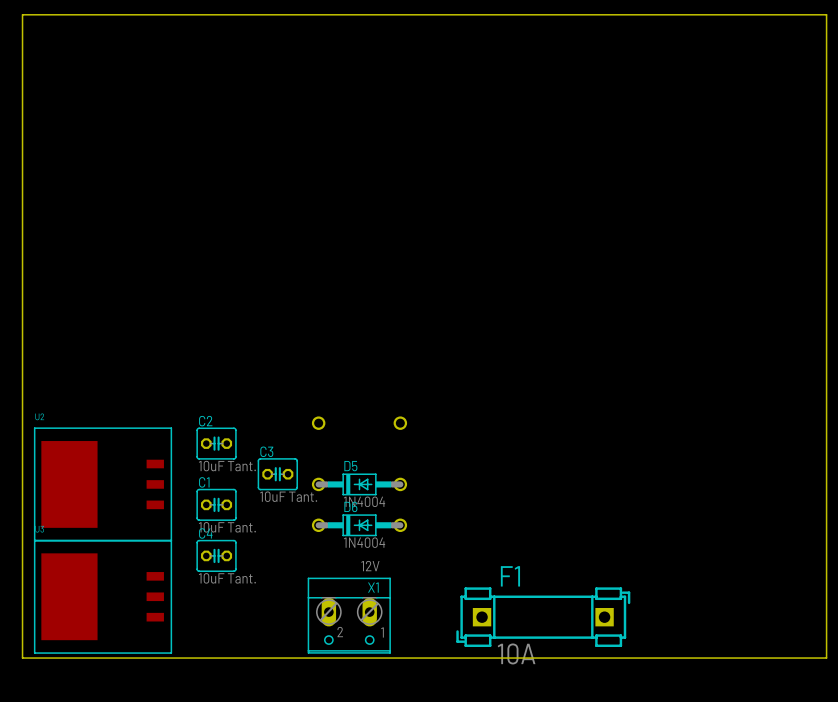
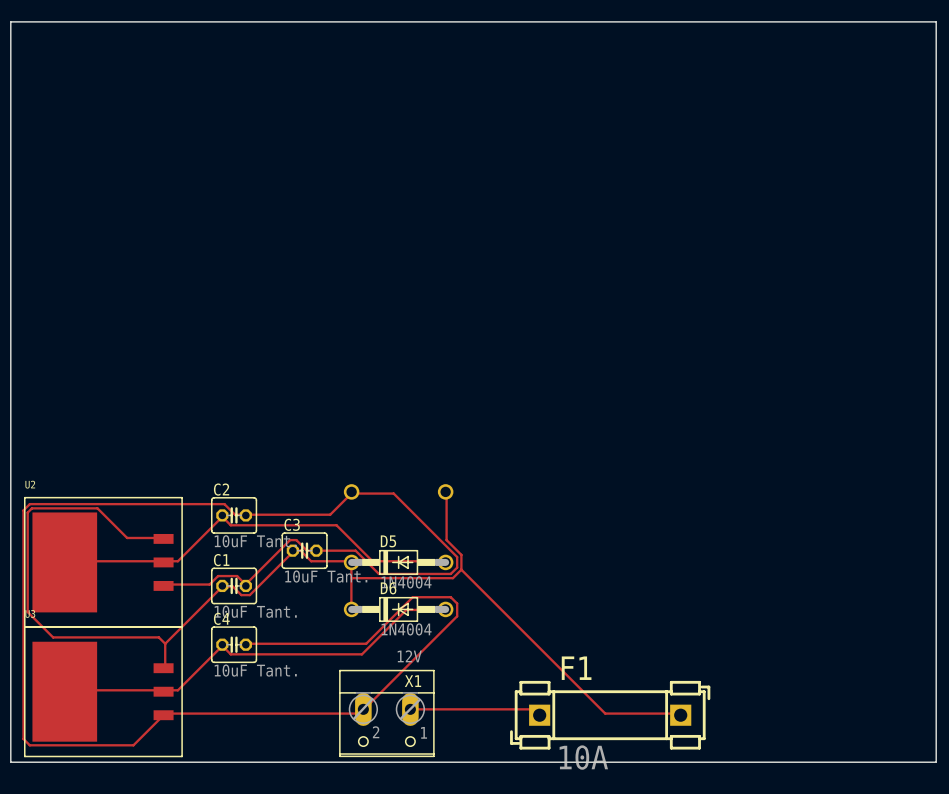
track: none -> (445, 491) (446, 540) (461, 554) (461, 569)
track: none -> (222, 516) (177, 561) (64, 562)
track: none -> (222, 516) (230, 525) (336, 525) (372, 561) (445, 562)
track: none -> (163, 538) (127, 537) (97, 508) (31, 508) (27, 512) (27, 612) (53, 637) (158, 637) (165, 643)
track: none -> (292, 550) (300, 550) (311, 561) (351, 561) (351, 609)
track: none -> (294, 550) (249, 595) (241, 595) (232, 586) (222, 586)
track: none -> (461, 569) (452, 578) (351, 578)
track: none -> (461, 569) (605, 713) (679, 713) (680, 715)
track: none -> (245, 584) (237, 576) (218, 576) (209, 584) (163, 585)
track: none -> (245, 584) (290, 540) (296, 540) (306, 550) (355, 550) (378, 573) (450, 573) (457, 567) (457, 557) (393, 493) (353, 493) (351, 491) (330, 514) (235, 514) (224, 504) (29, 504) (23, 510) (23, 738) (29, 745) (133, 745) (165, 713) (357, 713) (457, 616) (457, 603) (450, 597) (412, 597) (366, 643) (245, 644)
track: none -> (222, 586) (165, 643)
track: none -> (445, 609) (406, 609) (361, 654) (230, 654) (222, 645)
track: none -> (165, 643) (165, 667) (163, 668)
track: none -> (222, 645) (177, 690) (64, 691)
track: none -> (410, 709) (535, 709) (539, 715)

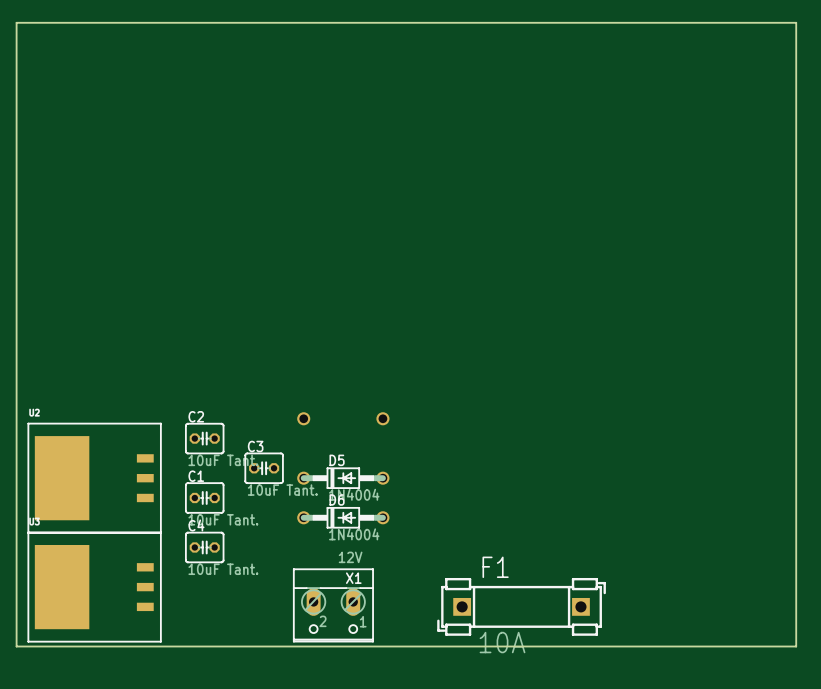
track: (445, 491) (446, 540) (461, 554) (461, 569) -> none
track: (222, 516) (177, 561) (64, 562) -> none
track: (222, 516) (230, 525) (336, 525) (372, 561) (445, 562) -> none
track: (163, 538) (127, 537) (97, 508) (31, 508) (27, 512) (27, 612) (53, 637) (158, 637) (165, 643) -> none
track: (292, 550) (300, 550) (311, 561) (351, 561) (351, 609) -> none
track: (294, 550) (249, 595) (241, 595) (232, 586) (222, 586) -> none
track: (461, 569) (452, 578) (351, 578) -> none
track: (461, 569) (605, 713) (679, 713) (680, 715) -> none
track: (245, 584) (237, 576) (218, 576) (209, 584) (163, 585) -> none
track: (245, 584) (290, 540) (296, 540) (306, 550) (355, 550) (378, 573) (450, 573) (457, 567) (457, 557) (393, 493) (353, 493) (351, 491) (330, 514) (235, 514) (224, 504) (29, 504) (23, 510) (23, 738) (29, 745) (133, 745) (165, 713) (357, 713) (457, 616) (457, 603) (450, 597) (412, 597) (366, 643) (245, 644) -> none
track: (222, 586) (165, 643) -> none
track: (445, 609) (406, 609) (361, 654) (230, 654) (222, 645) -> none
track: (165, 643) (165, 667) (163, 668) -> none
track: (222, 645) (177, 690) (64, 691) -> none
track: (410, 709) (535, 709) (539, 715) -> none

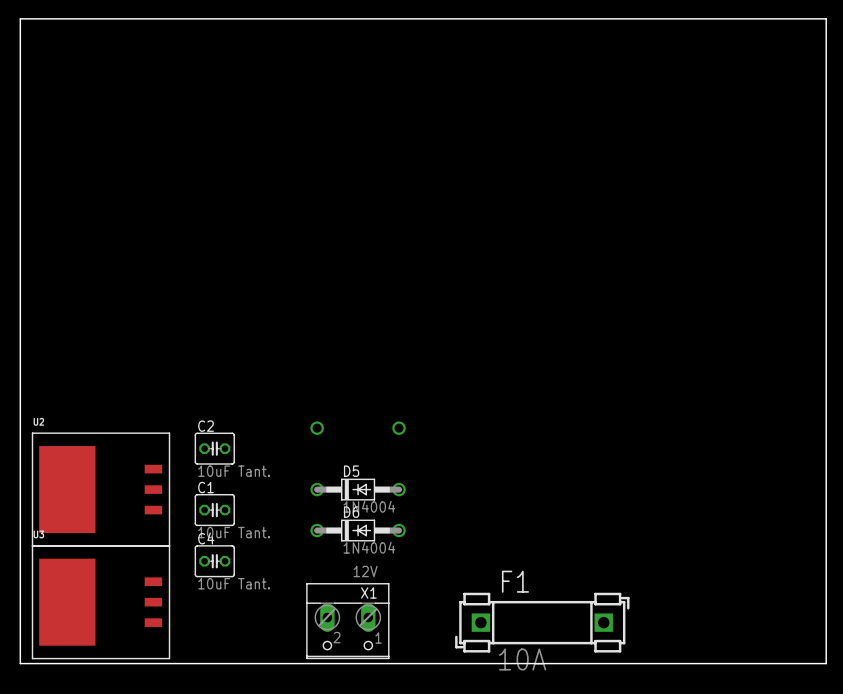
C3: 10uF Tant. (264, 468) -> none

